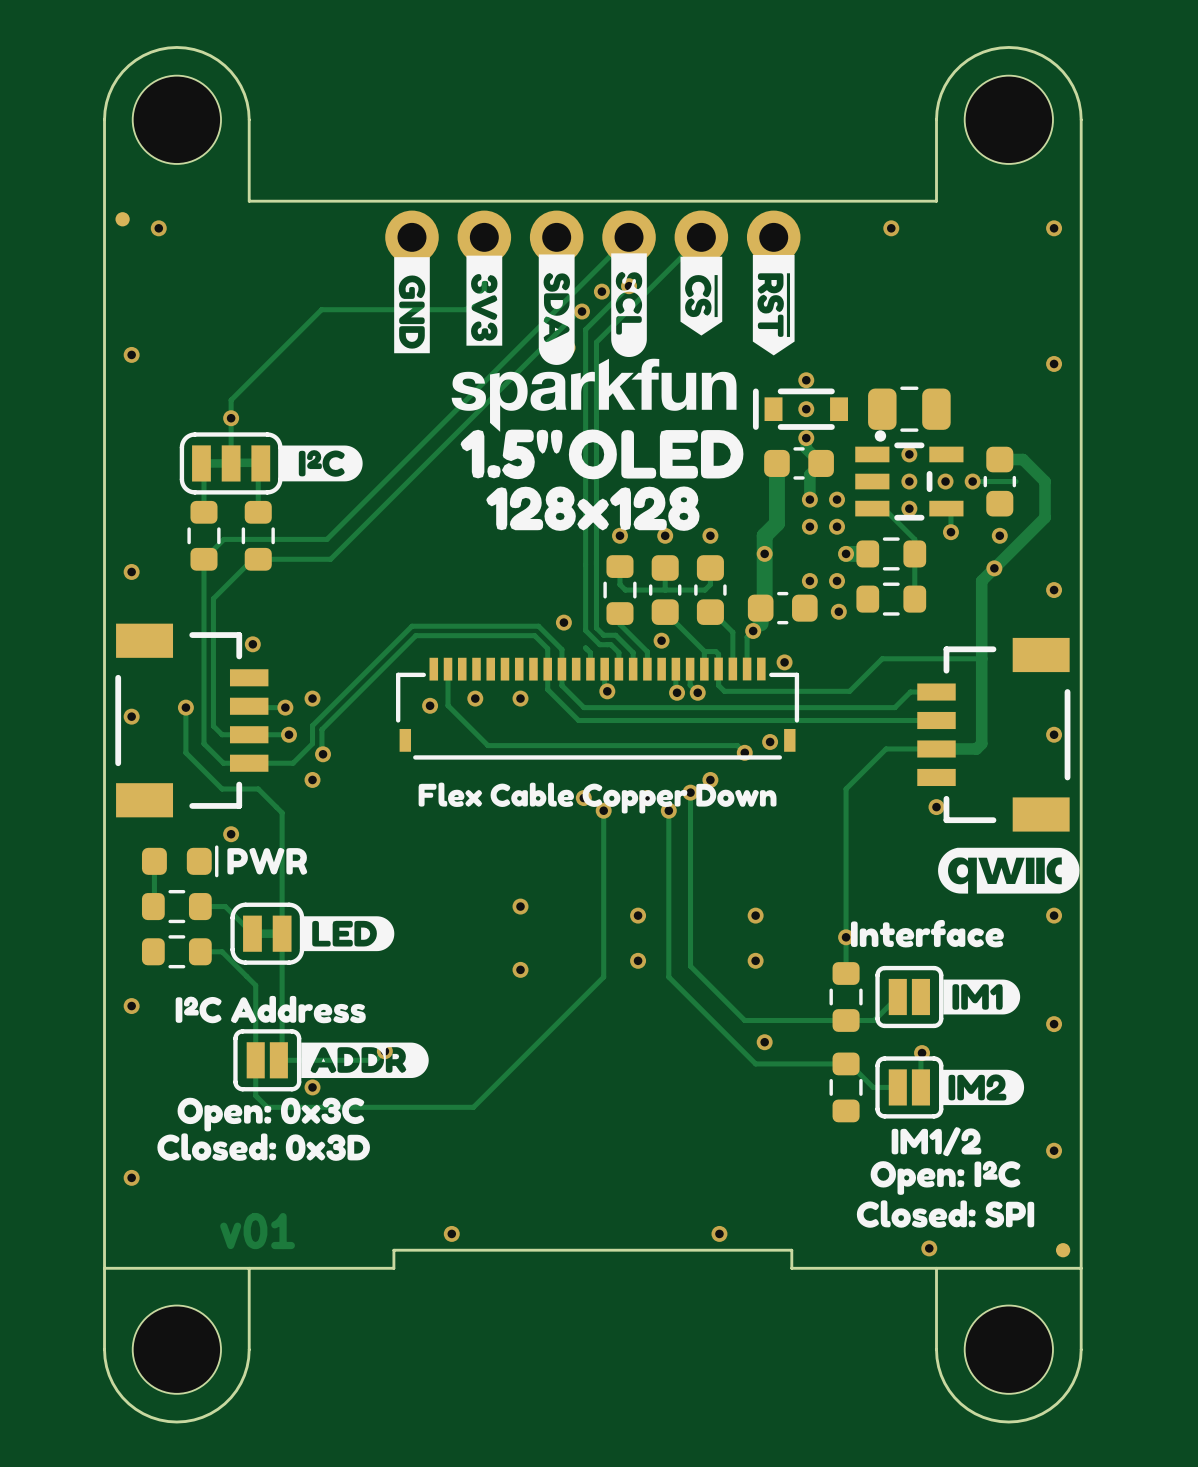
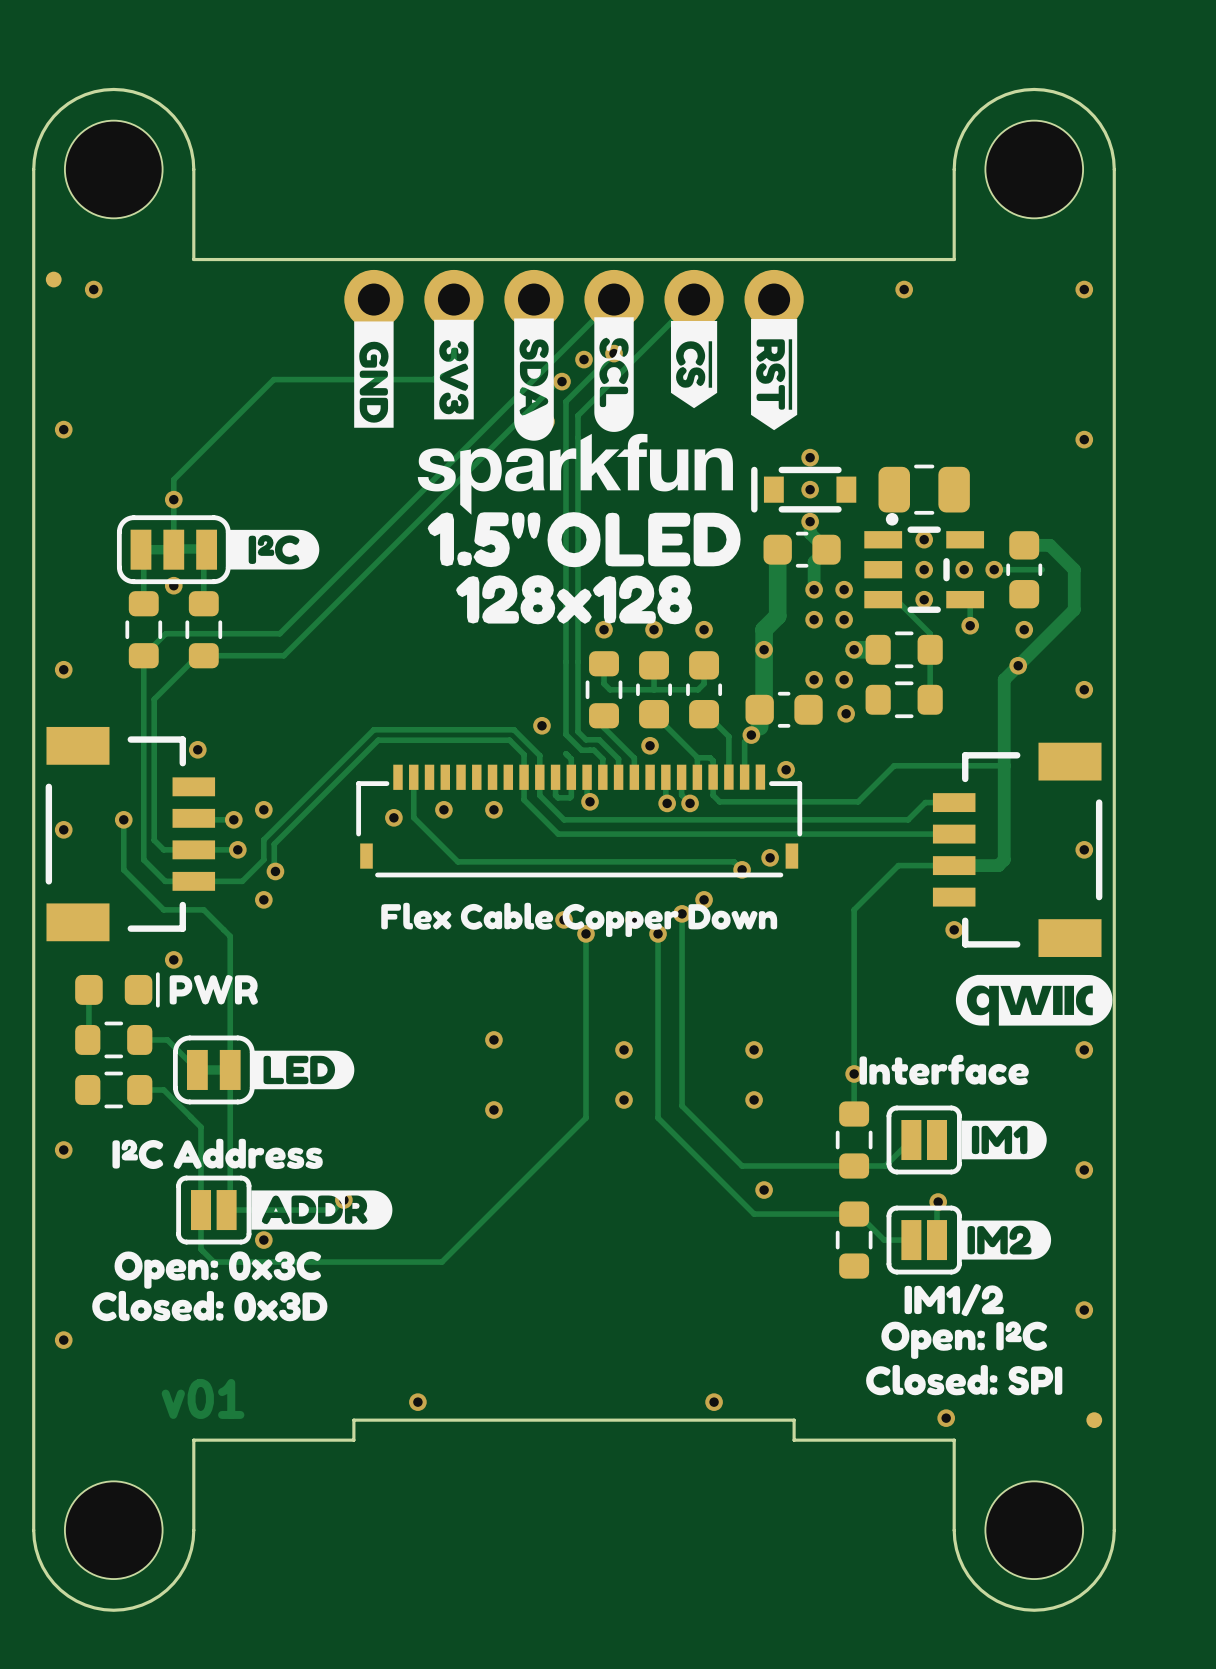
via: none -> (173, 585)
track: none -> (555, 777) (555, 795) (557, 797) (571, 796) (571, 777)
board edge: (104, 1268) (249, 1268) -> none
board edge: (936, 1268) (1081, 1268) -> none

